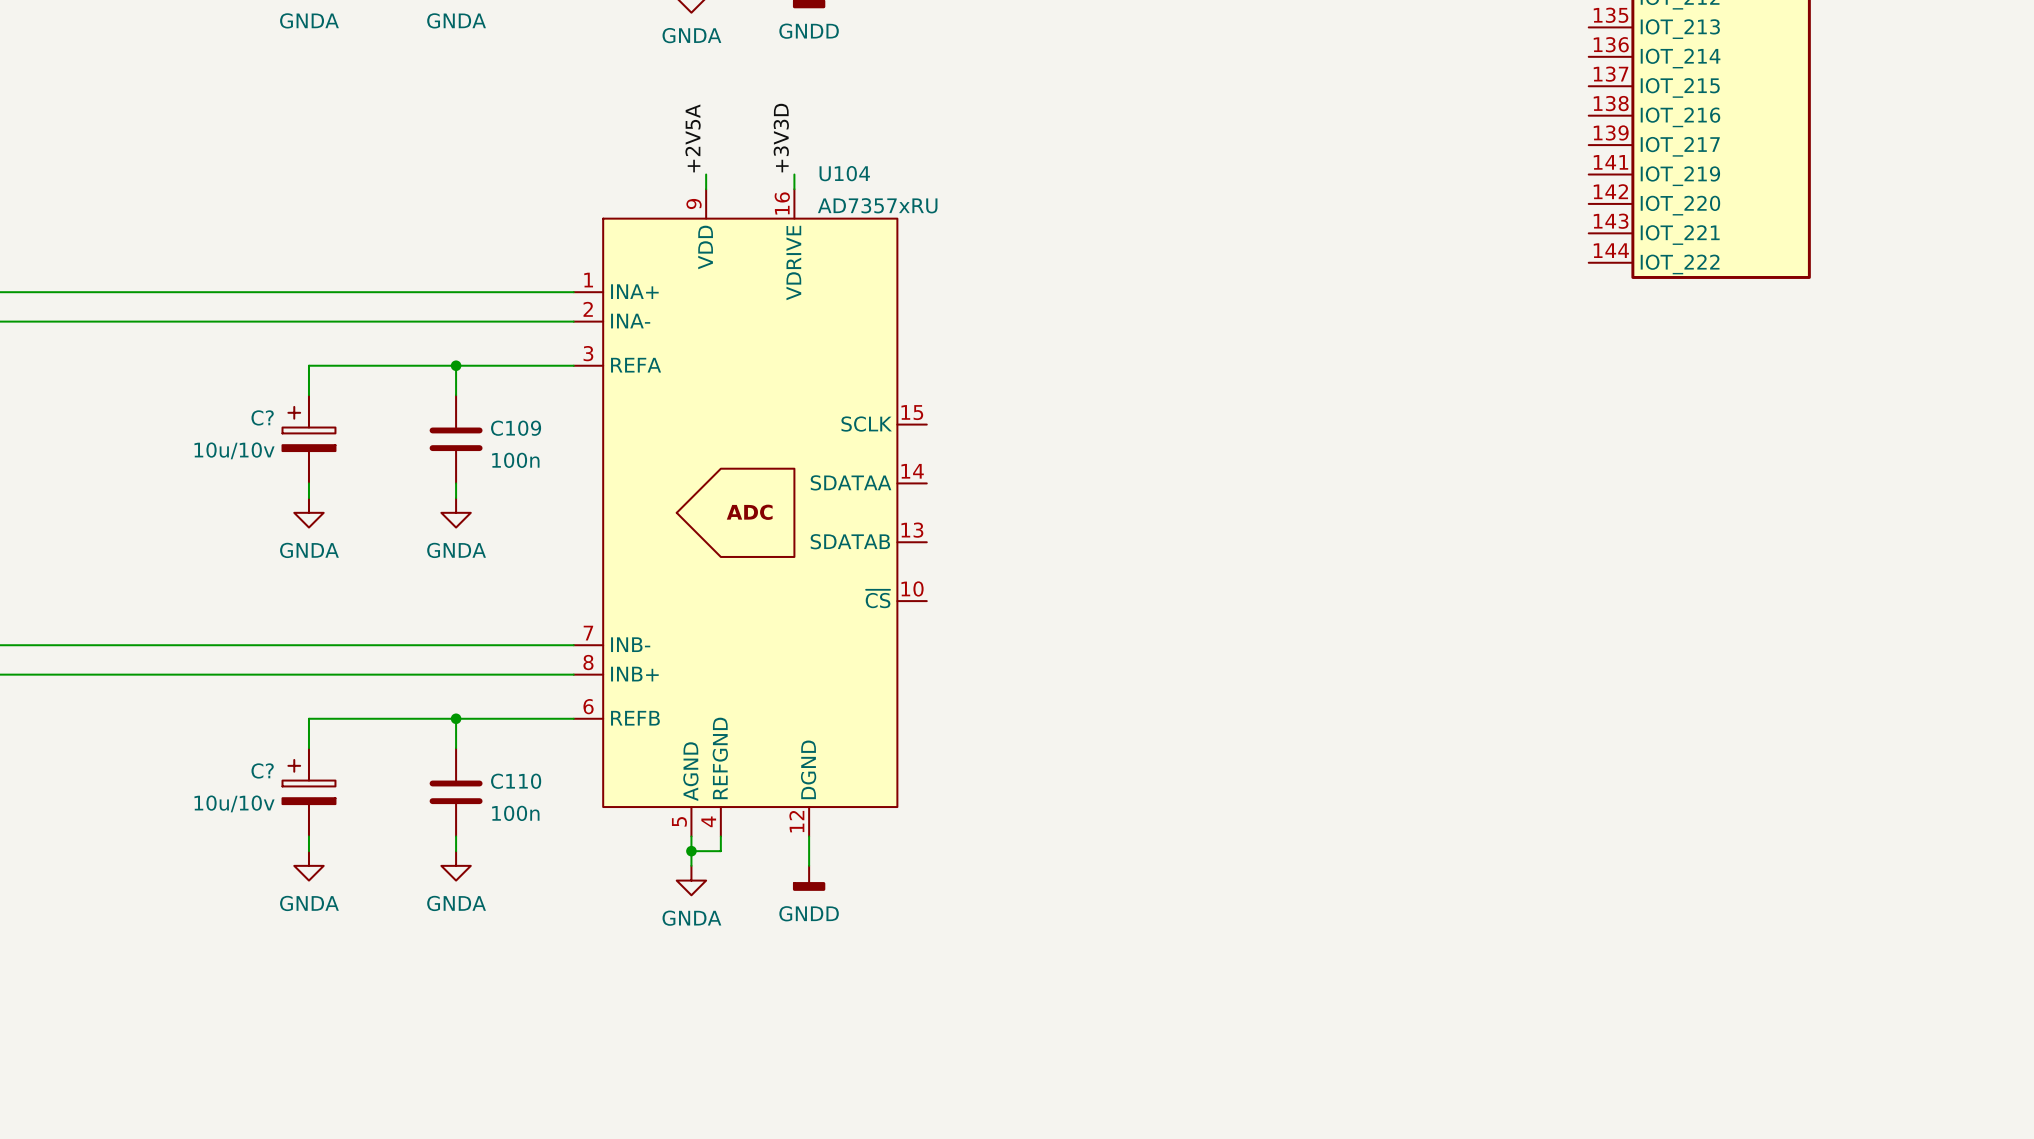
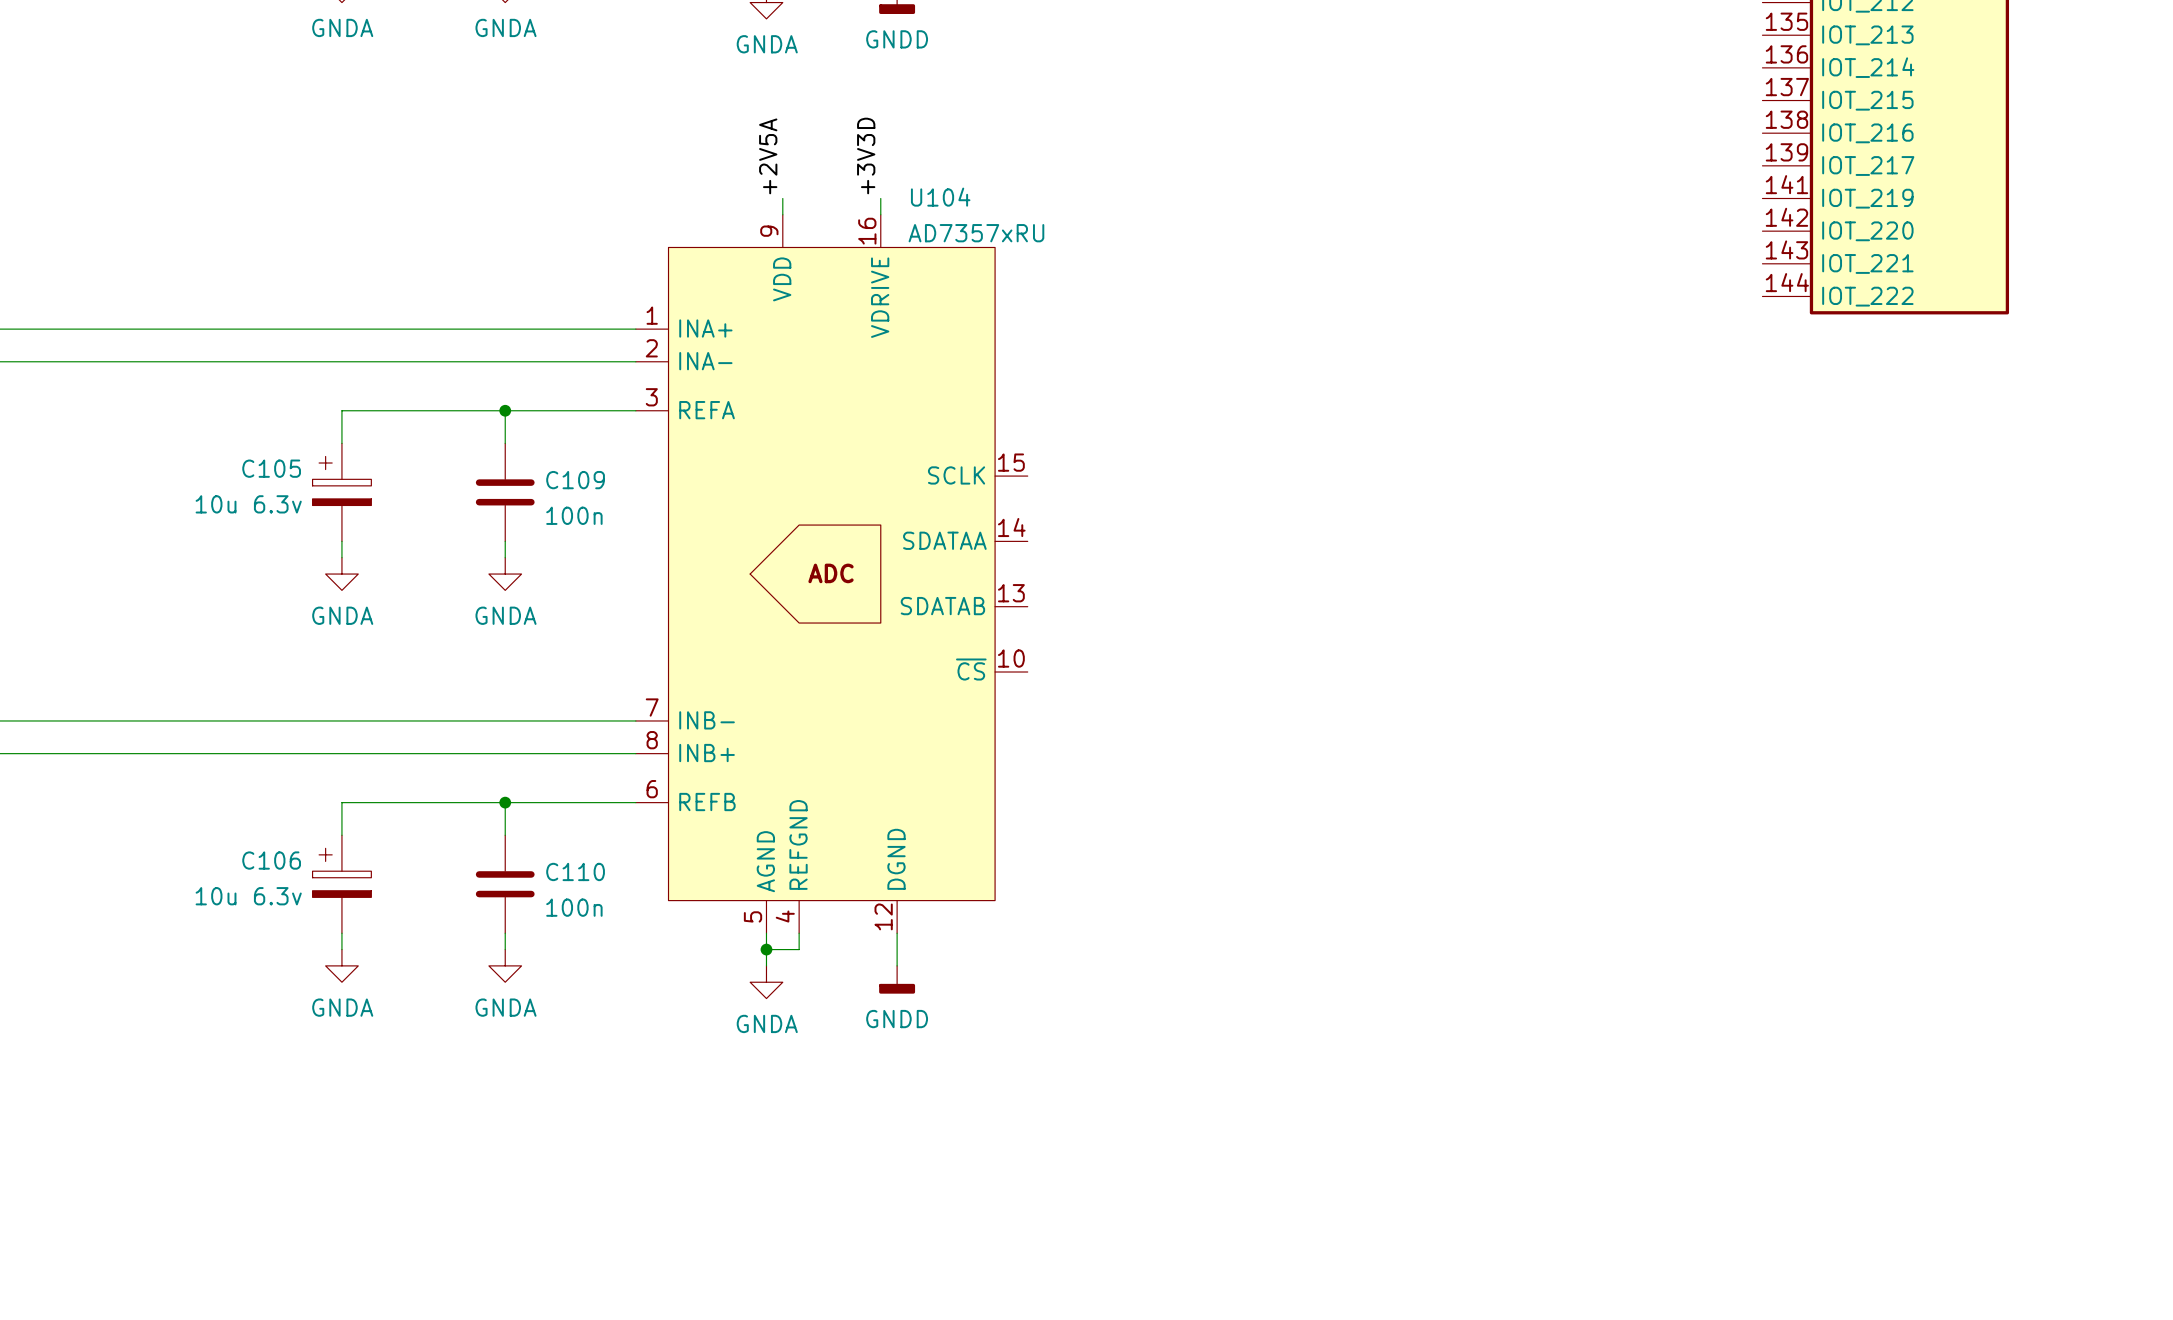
C? name: C? (262, 417) -> C105 (271, 468)
C? value: 10u/10v (234, 450) -> 10u 6.3v (248, 504)
C? name: C? (262, 770) -> C106 (271, 860)
C? value: 10u/10v (234, 803) -> 10u 6.3v (248, 896)

